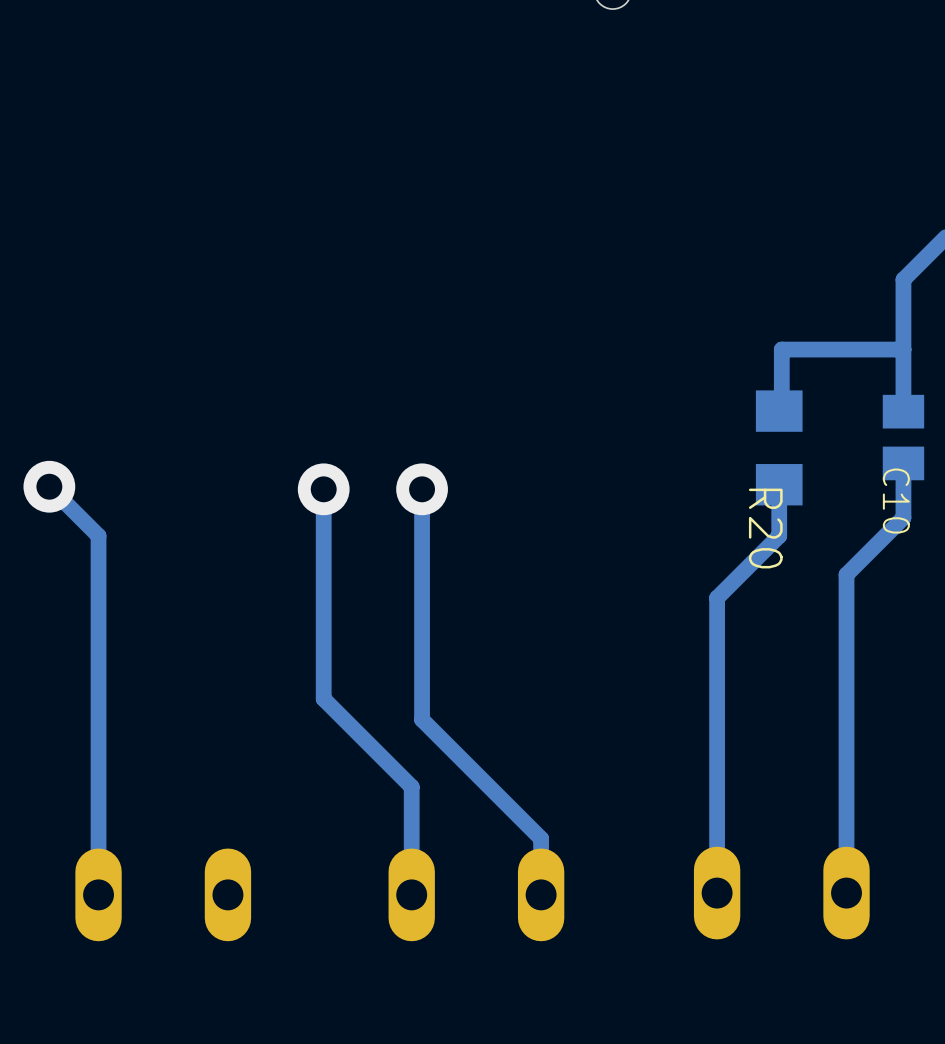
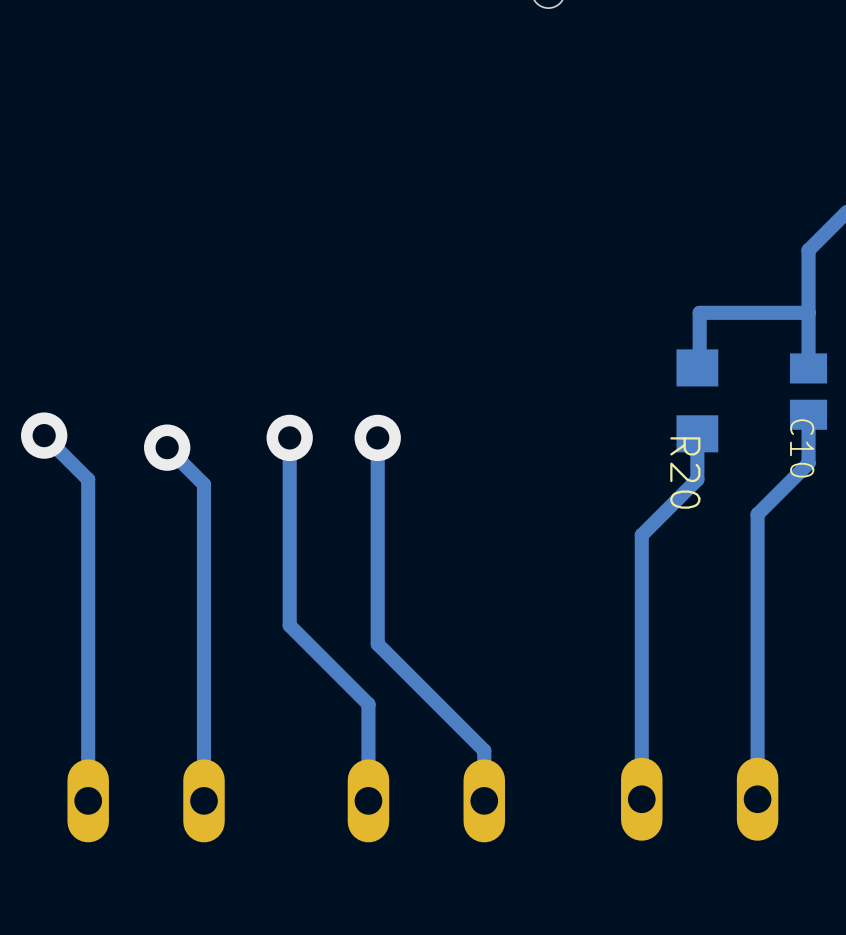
track: none -> (167, 447) (204, 484) (204, 800)
via: none -> (167, 447)

